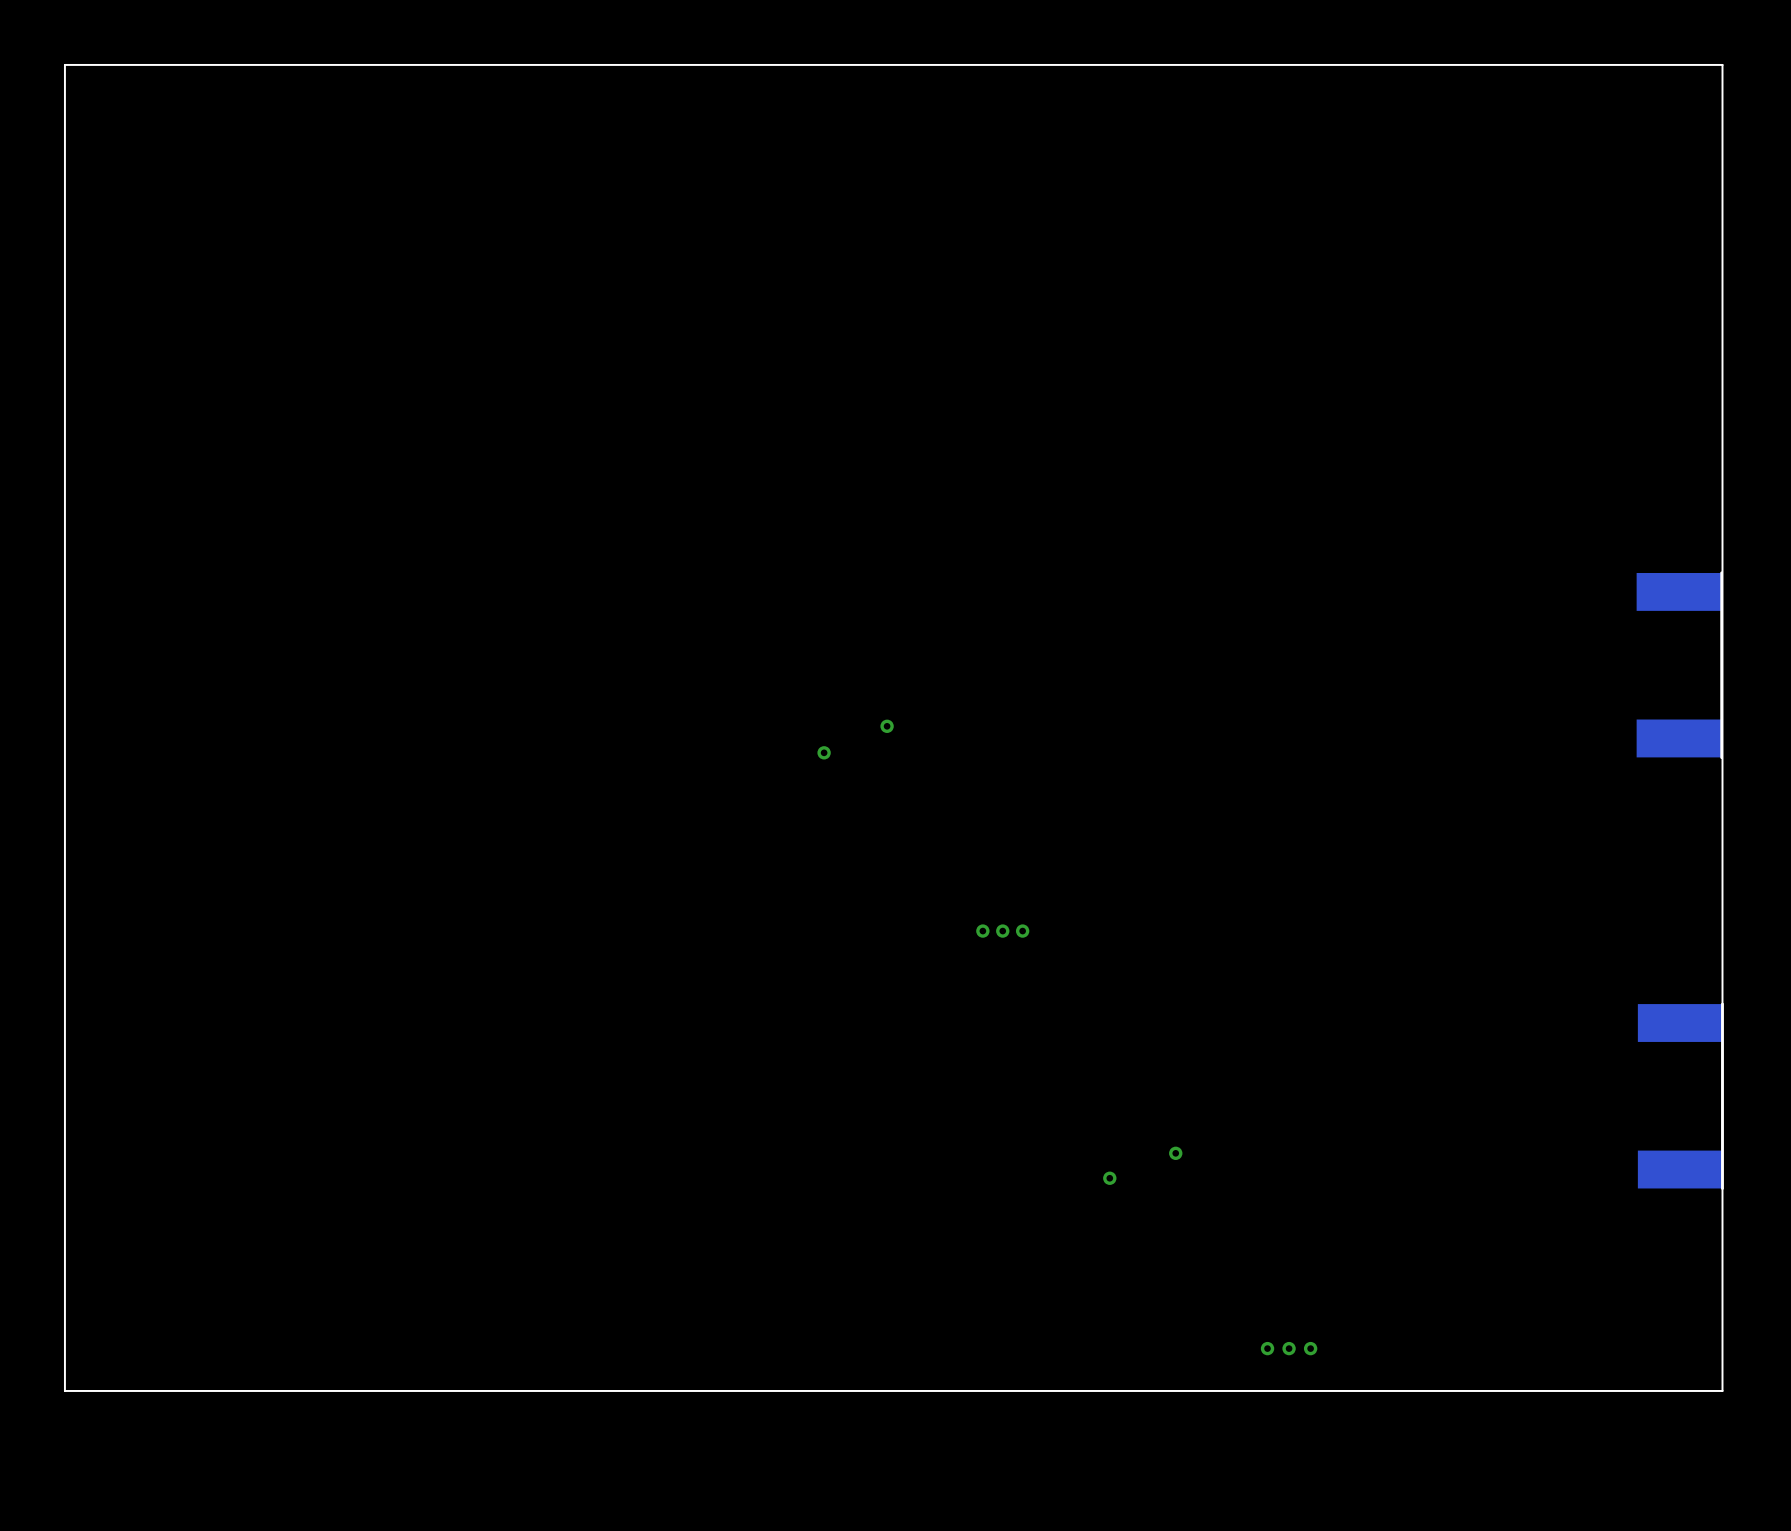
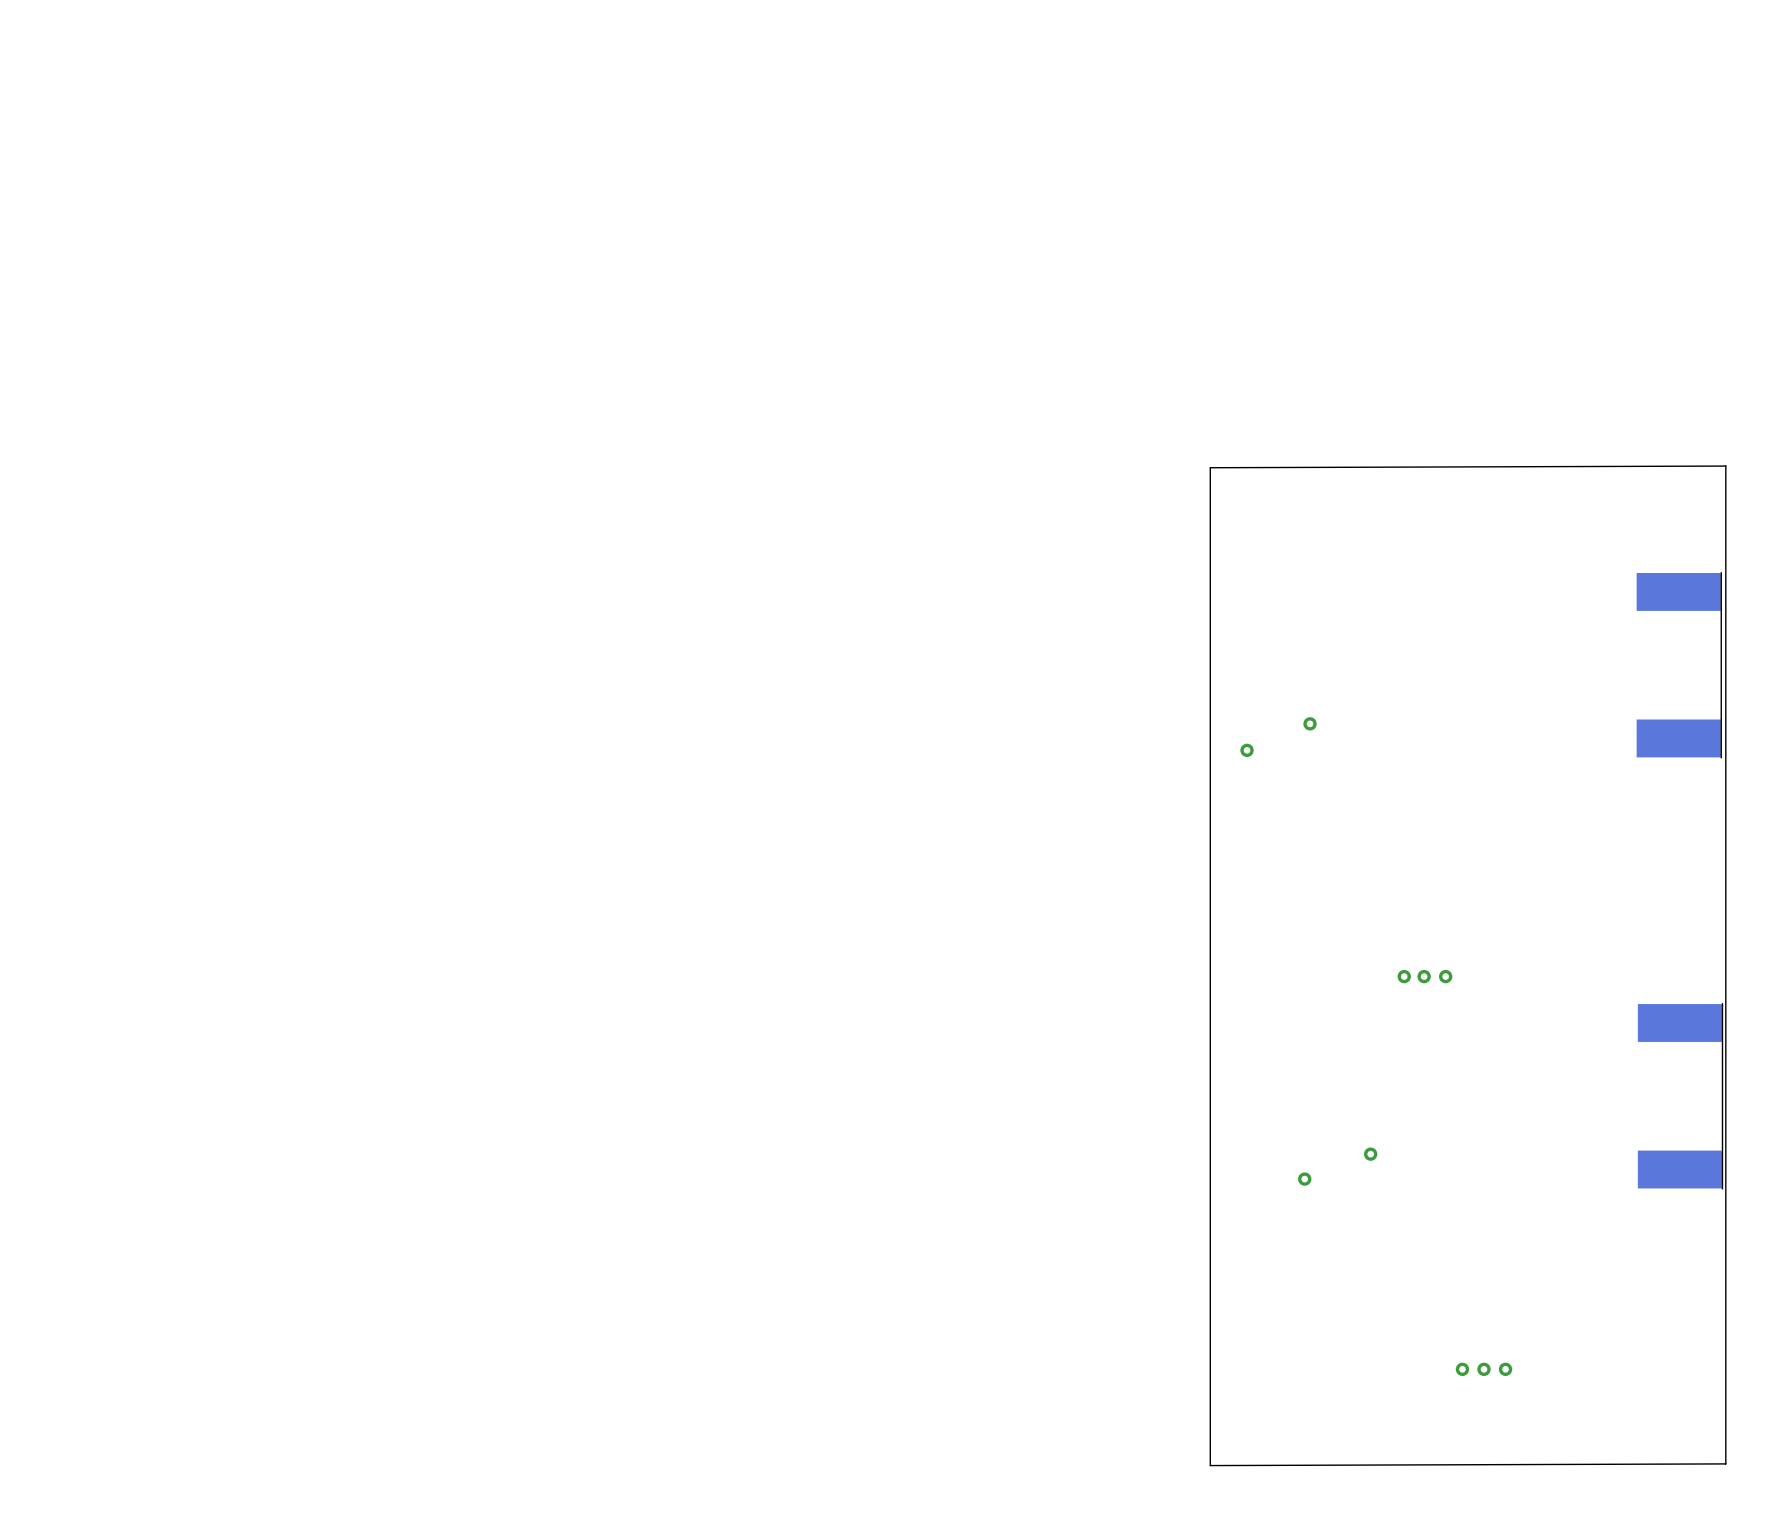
board edge: (1722, 64) (64, 64) (64, 1390) (1722, 1390) (1722, 64) -> none
board edge: none -> (1725, 466) (1210, 467) (1210, 1465) (1725, 1463) (1725, 466)
via: none -> (1310, 723)
via: (887, 726) -> none
via: none -> (1247, 750)
via: (824, 752) -> none
via: (982, 931) -> none
via: (1002, 931) -> none
via: (1022, 931) -> none
via: none -> (1404, 976)
via: none -> (1424, 976)
via: none -> (1445, 976)
via: (1175, 1153) -> none
via: none -> (1370, 1154)
via: (1109, 1178) -> none
via: none -> (1304, 1179)
via: (1267, 1348) -> none
via: (1289, 1348) -> none
via: (1310, 1348) -> none
via: none -> (1462, 1369)
via: none -> (1484, 1369)
via: none -> (1505, 1369)

